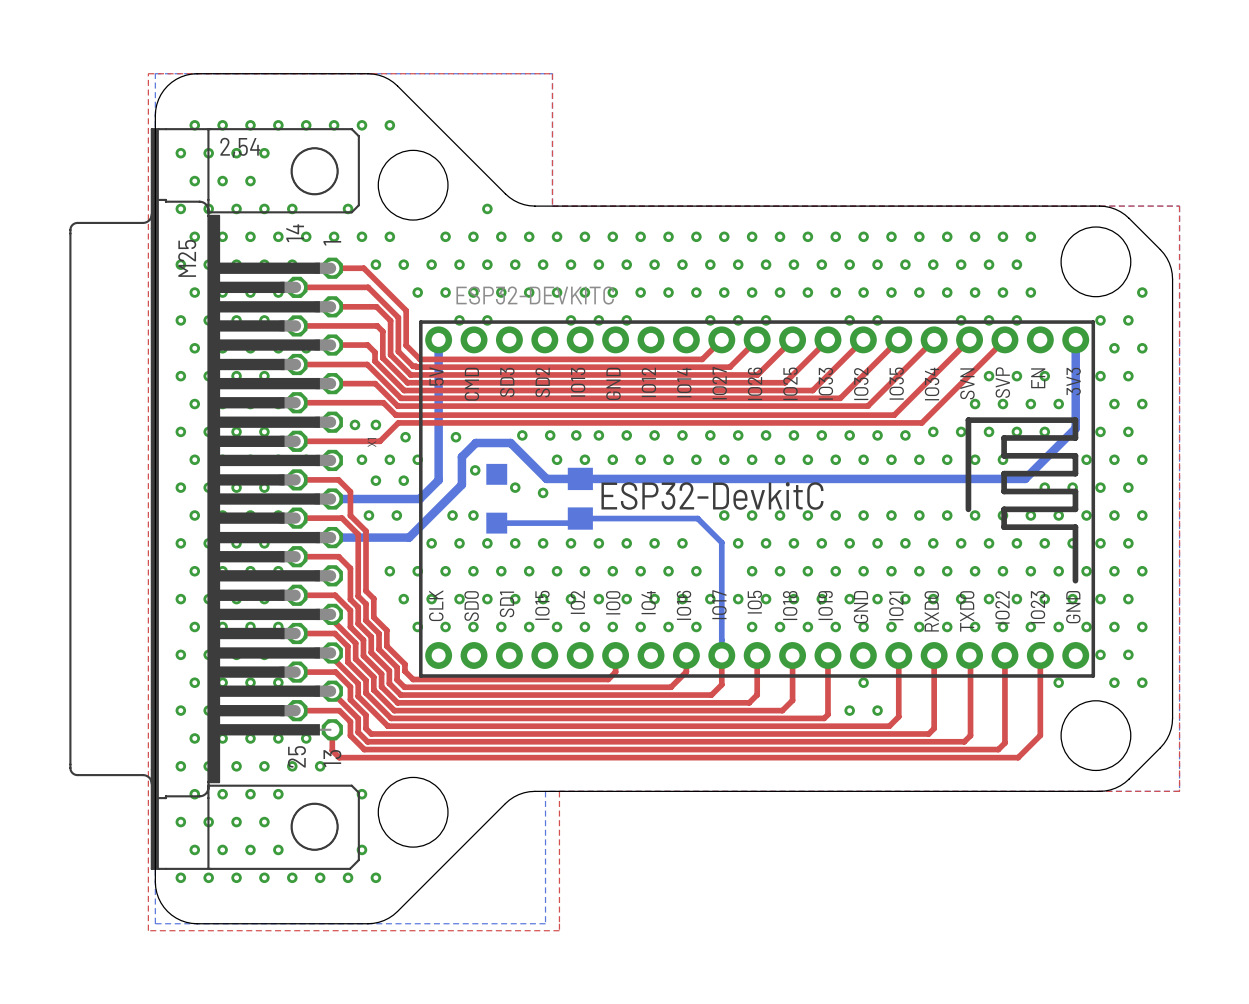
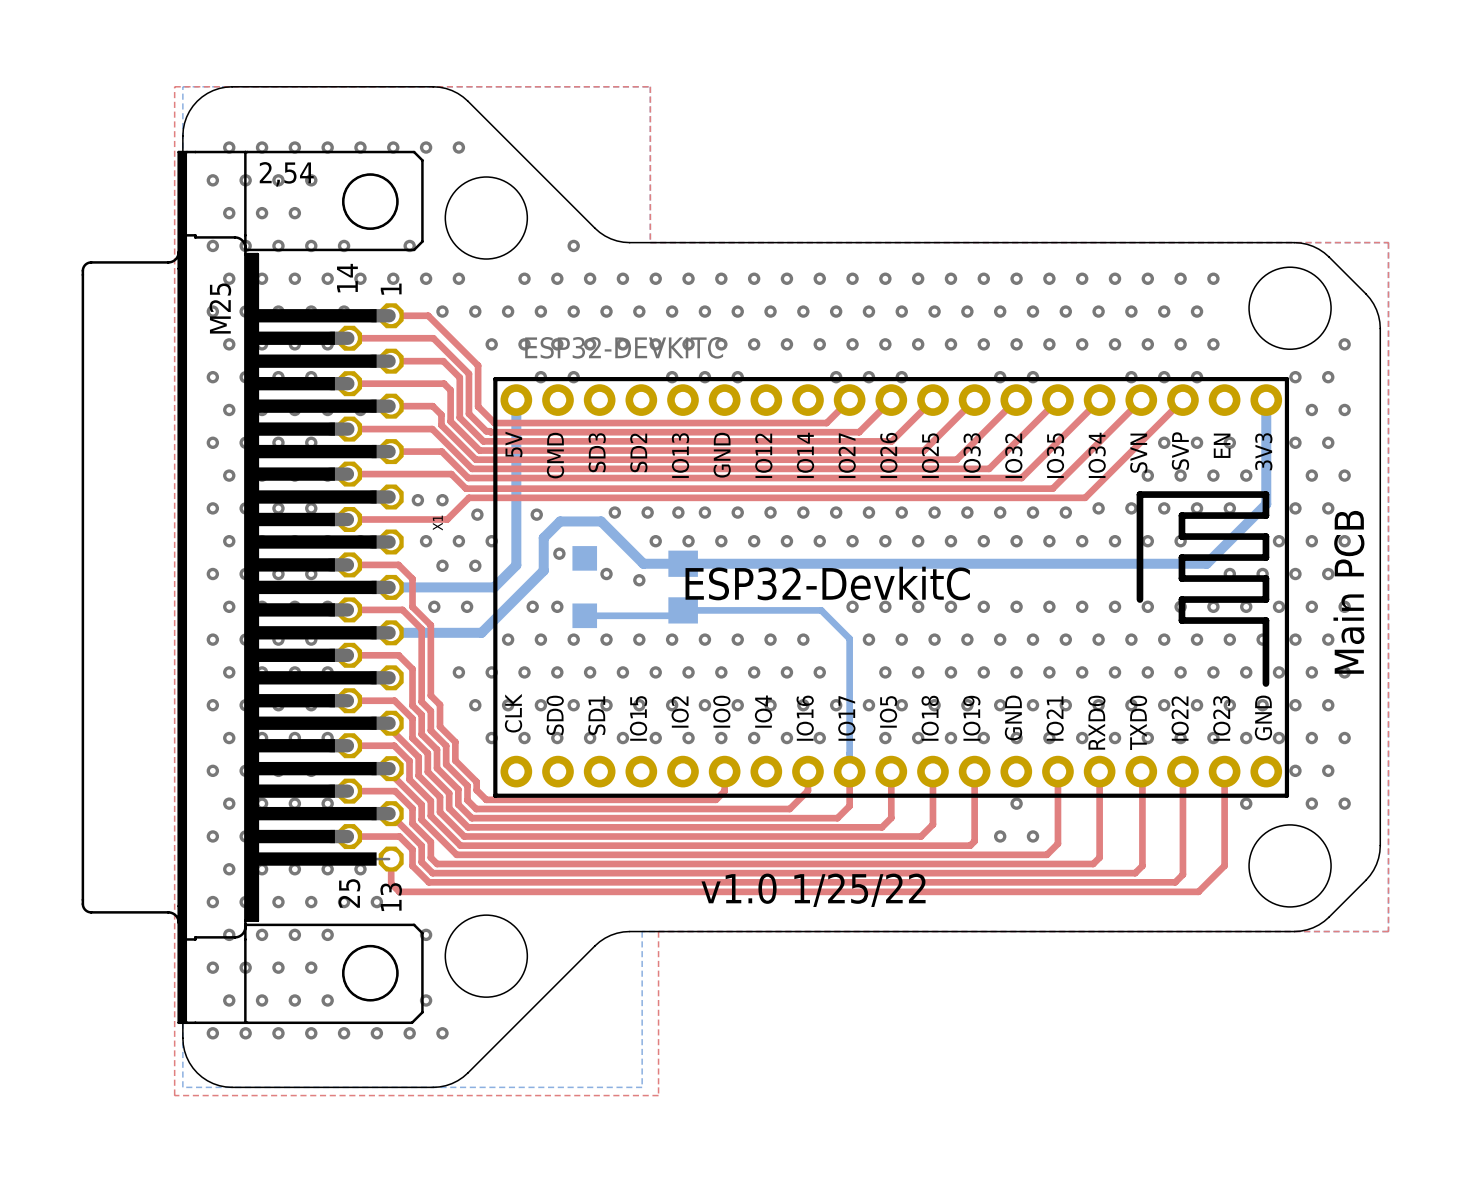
text: none -> Main PCB (1348, 592)
text: none -> v1.0 1/25/22 (813, 890)

